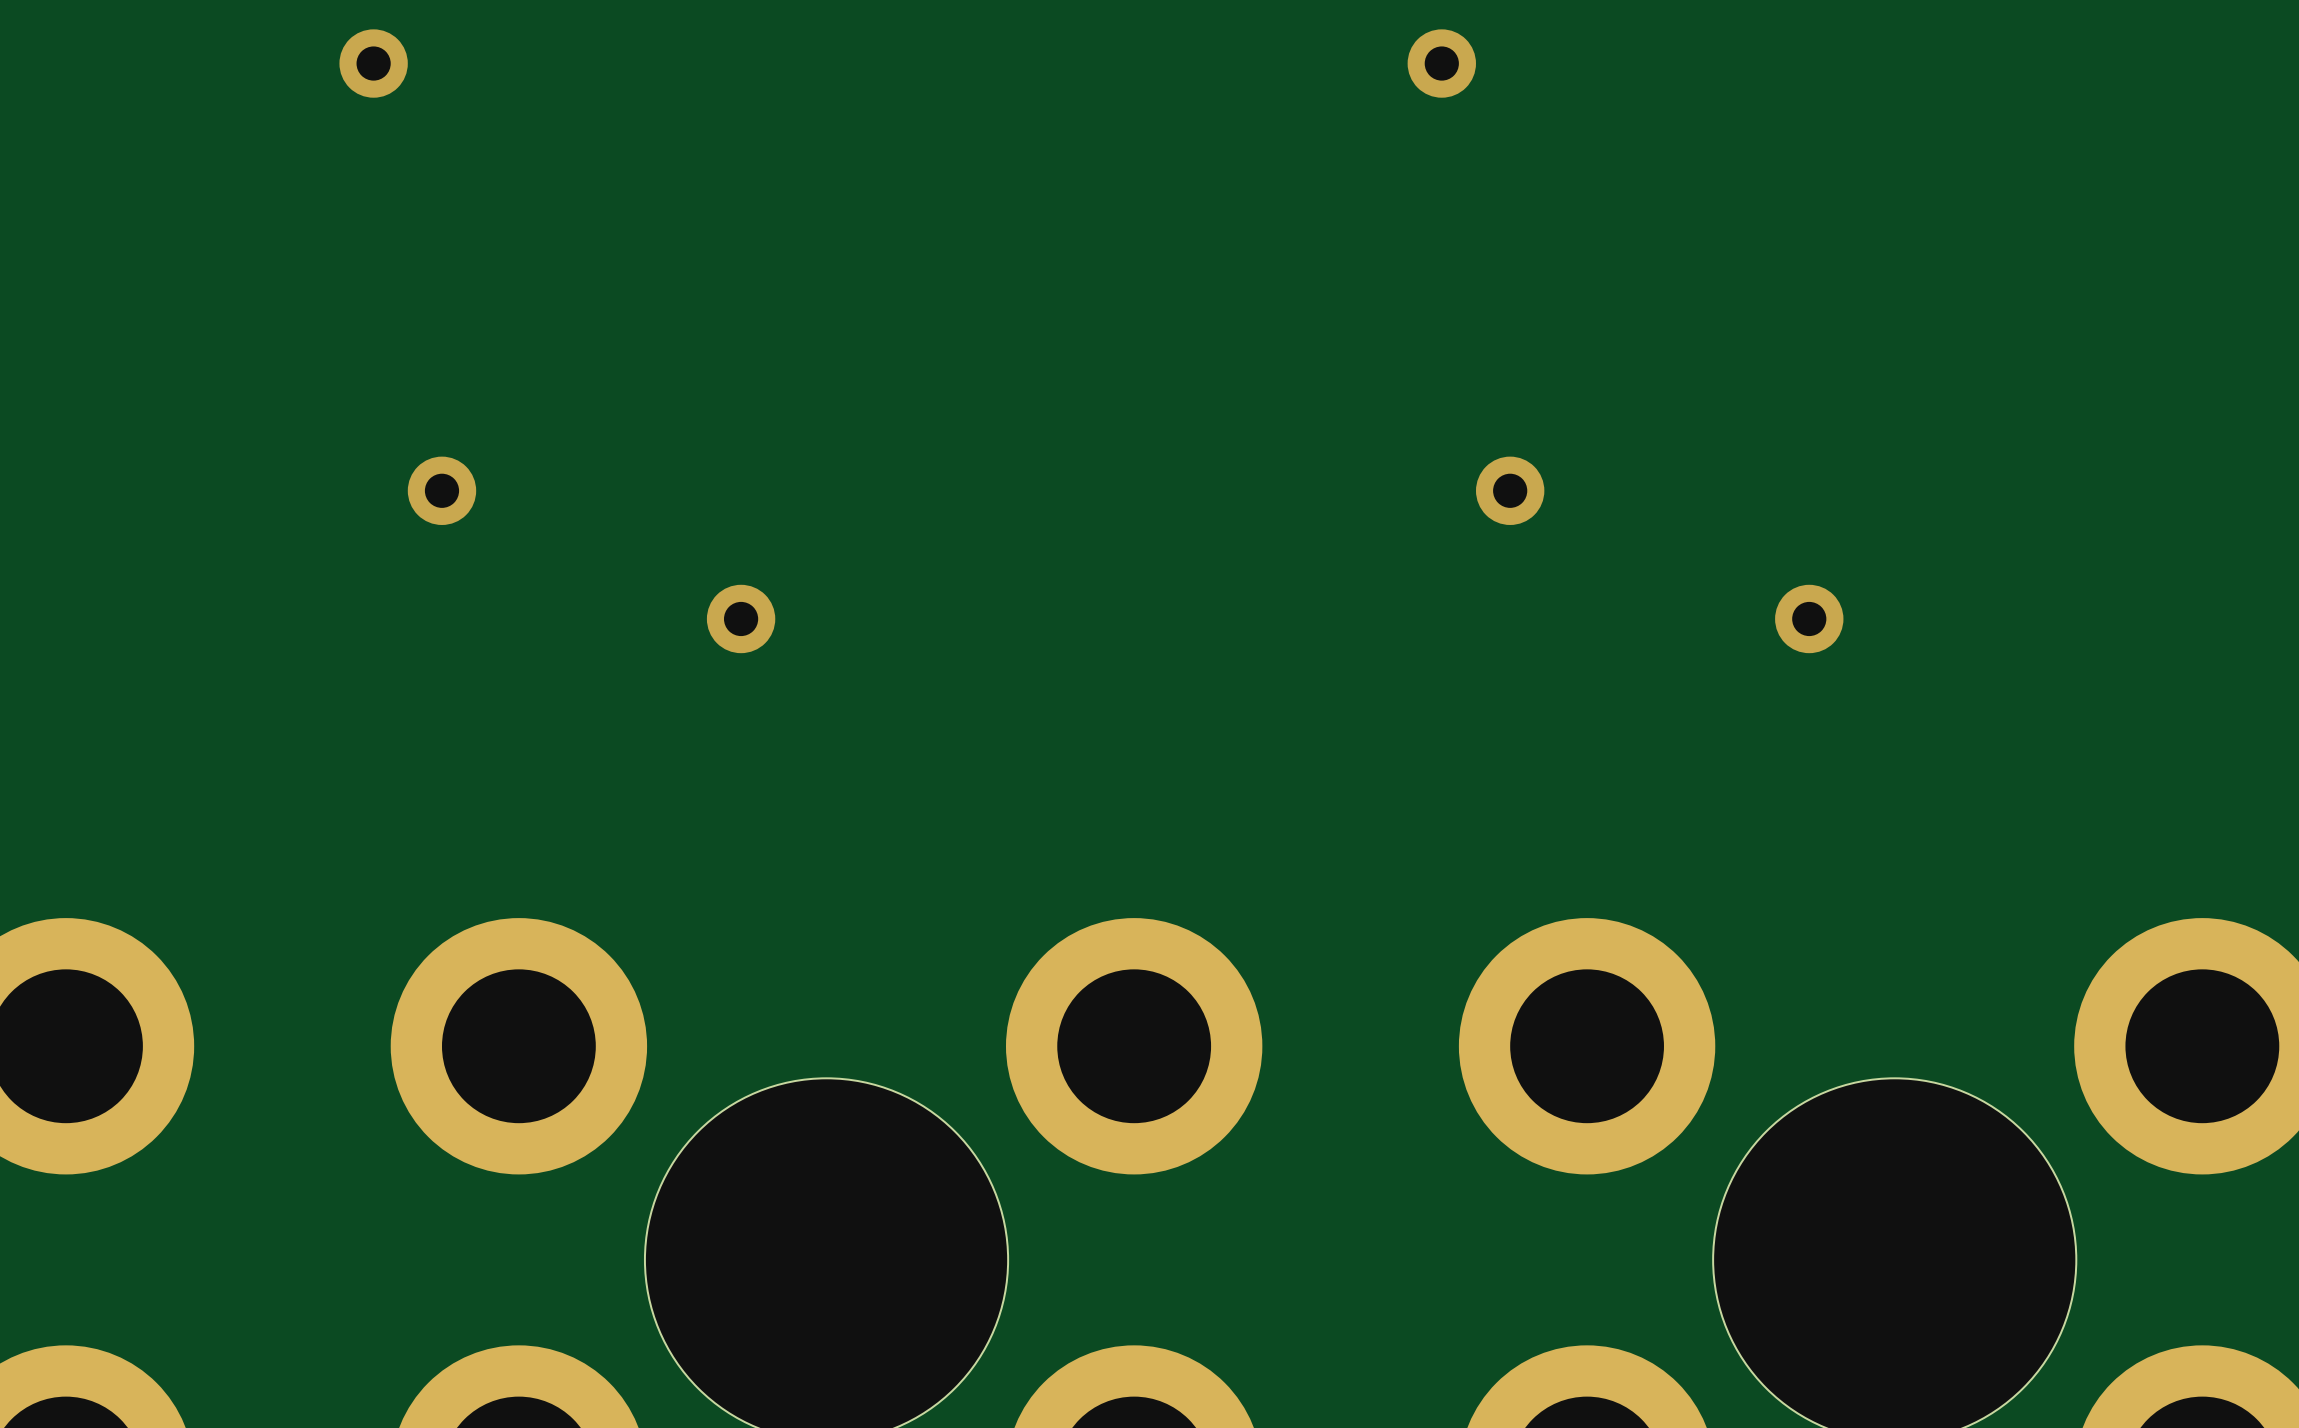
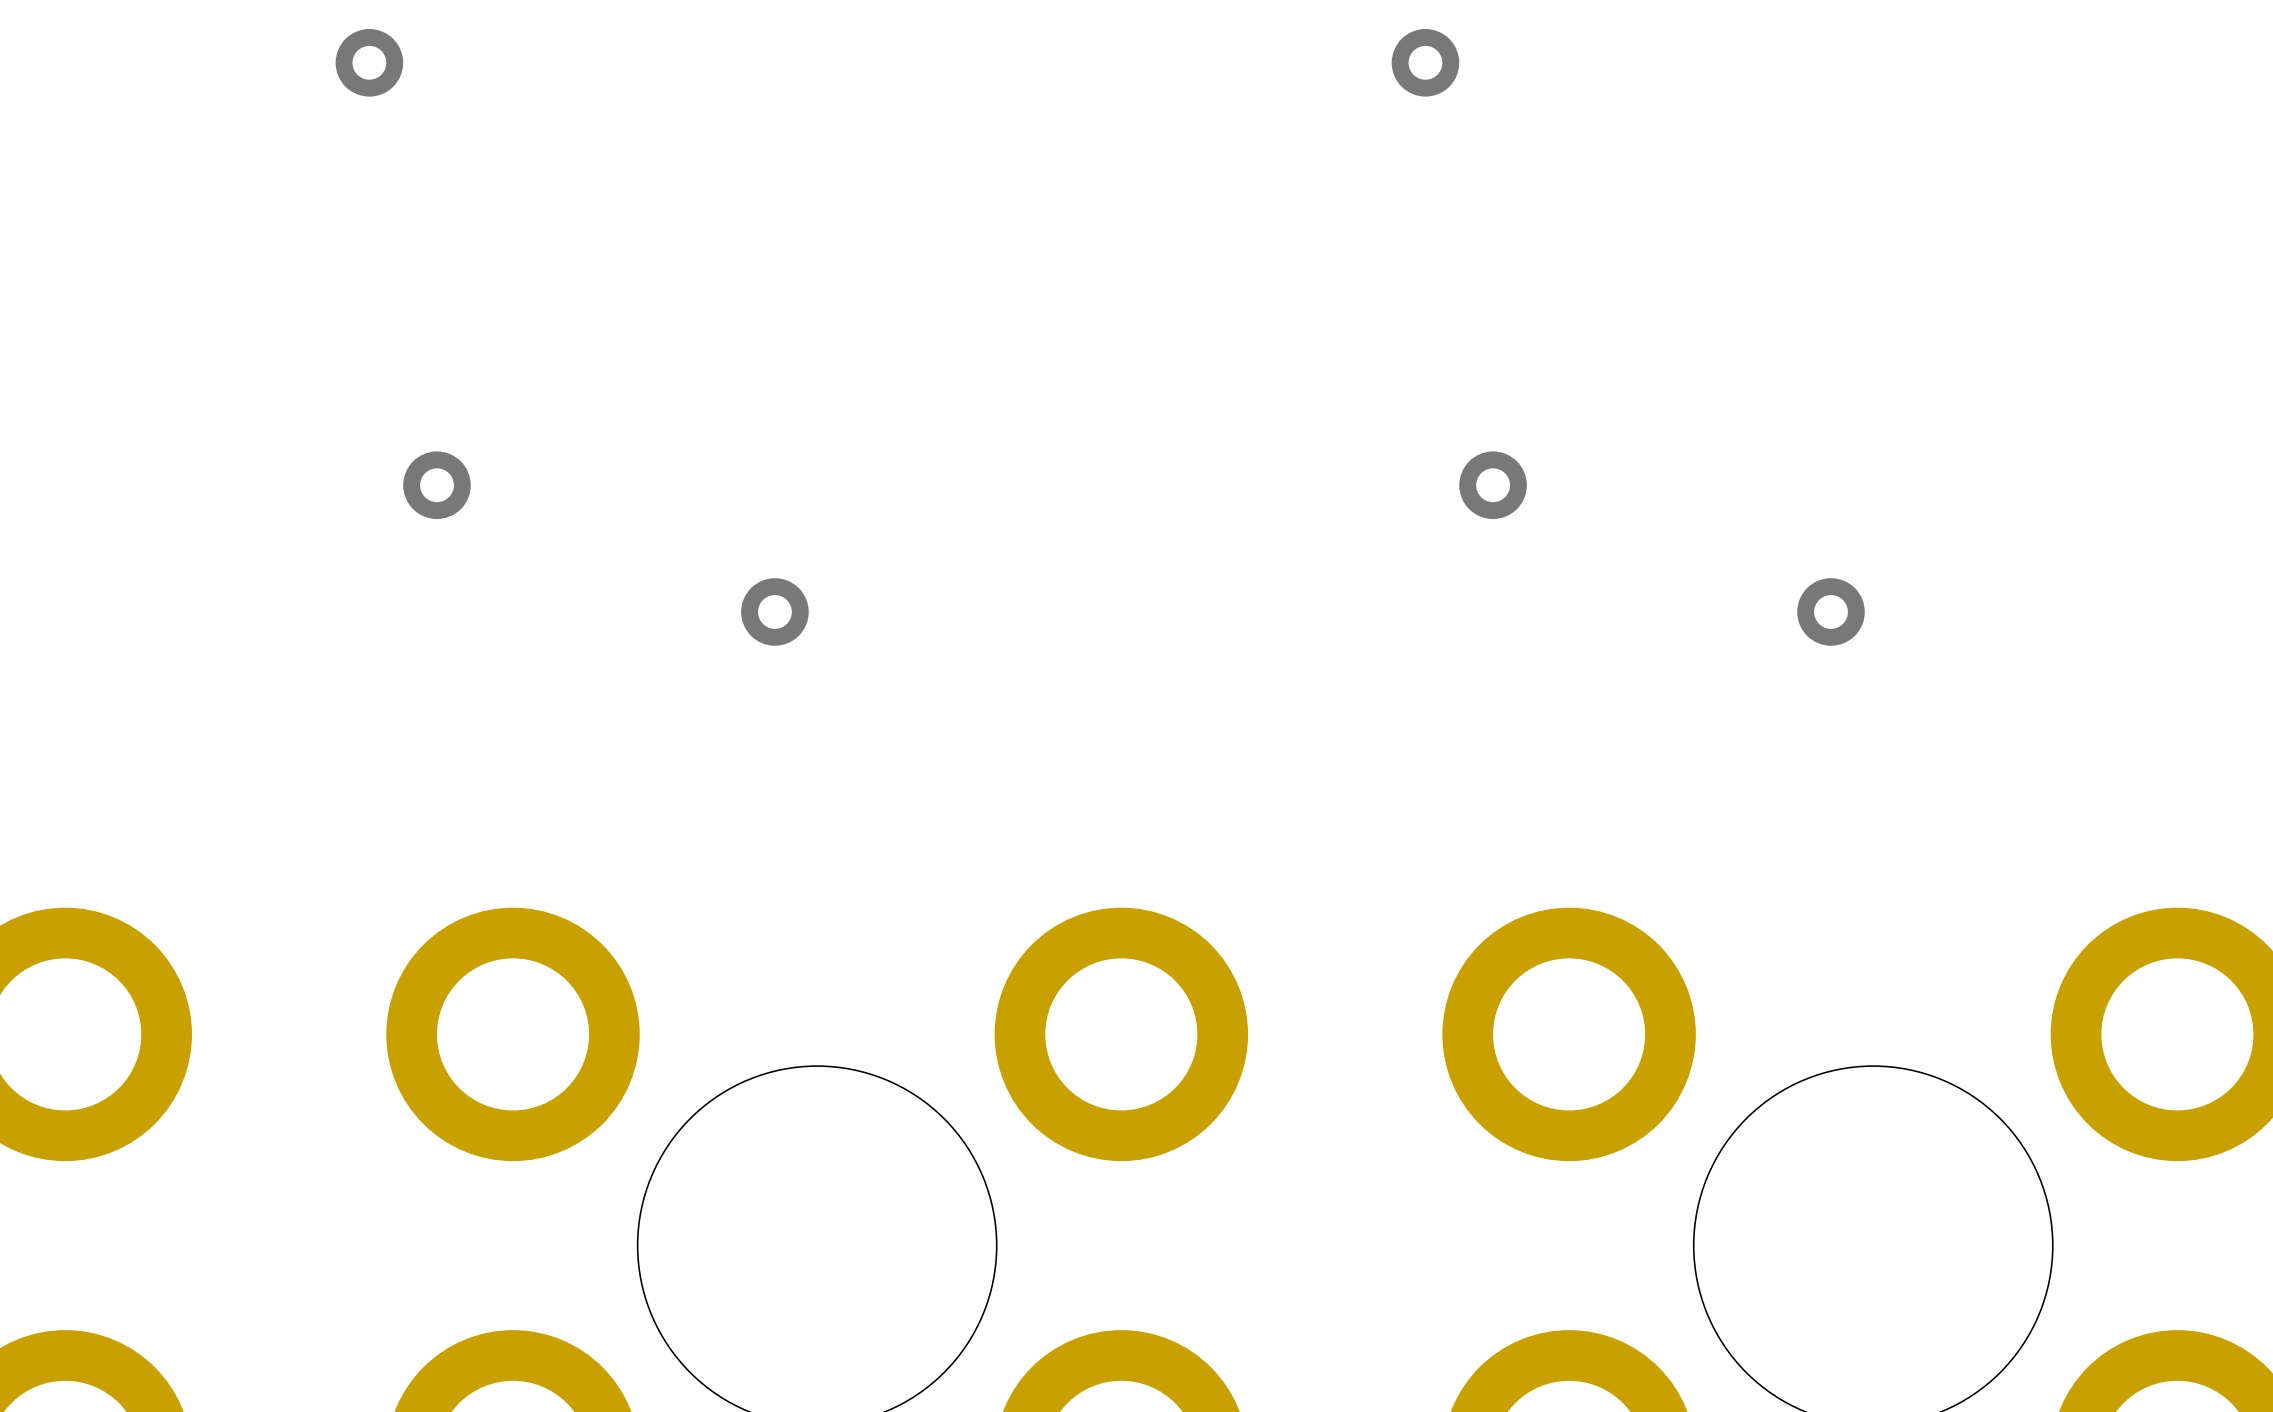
via position: (741, 618) -> (774, 611)
via position: (1809, 618) -> (1831, 611)

